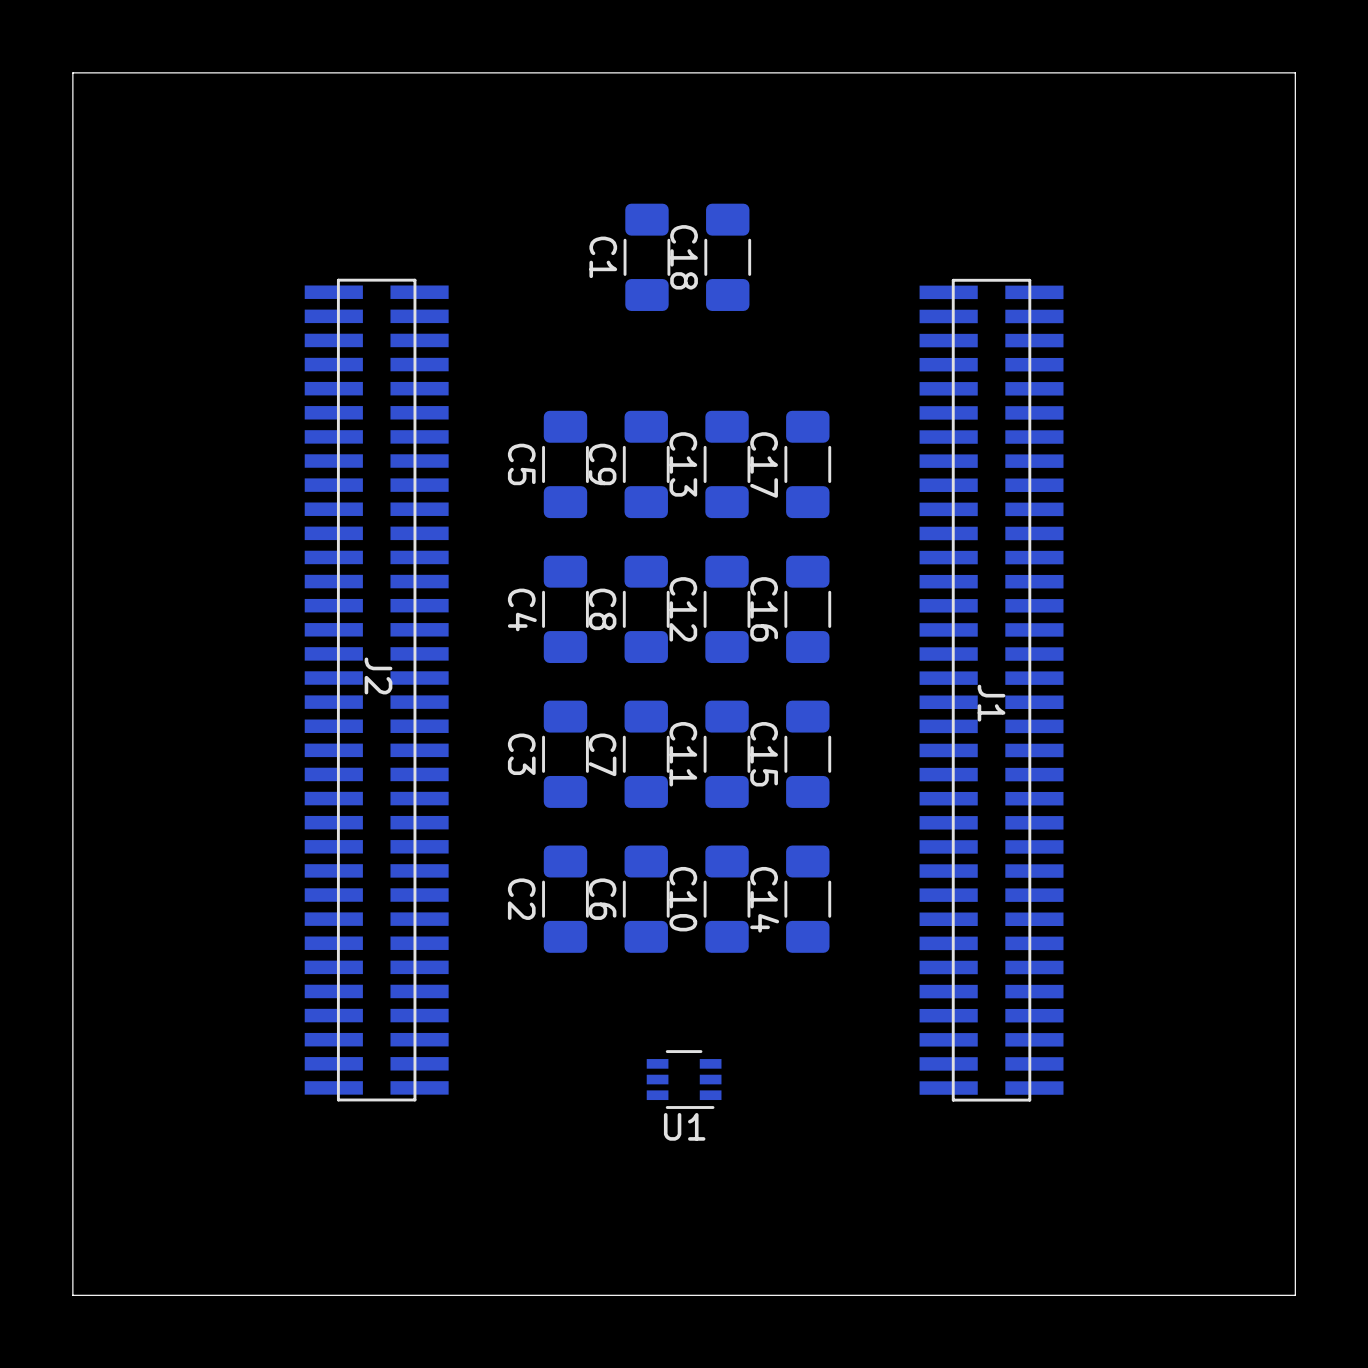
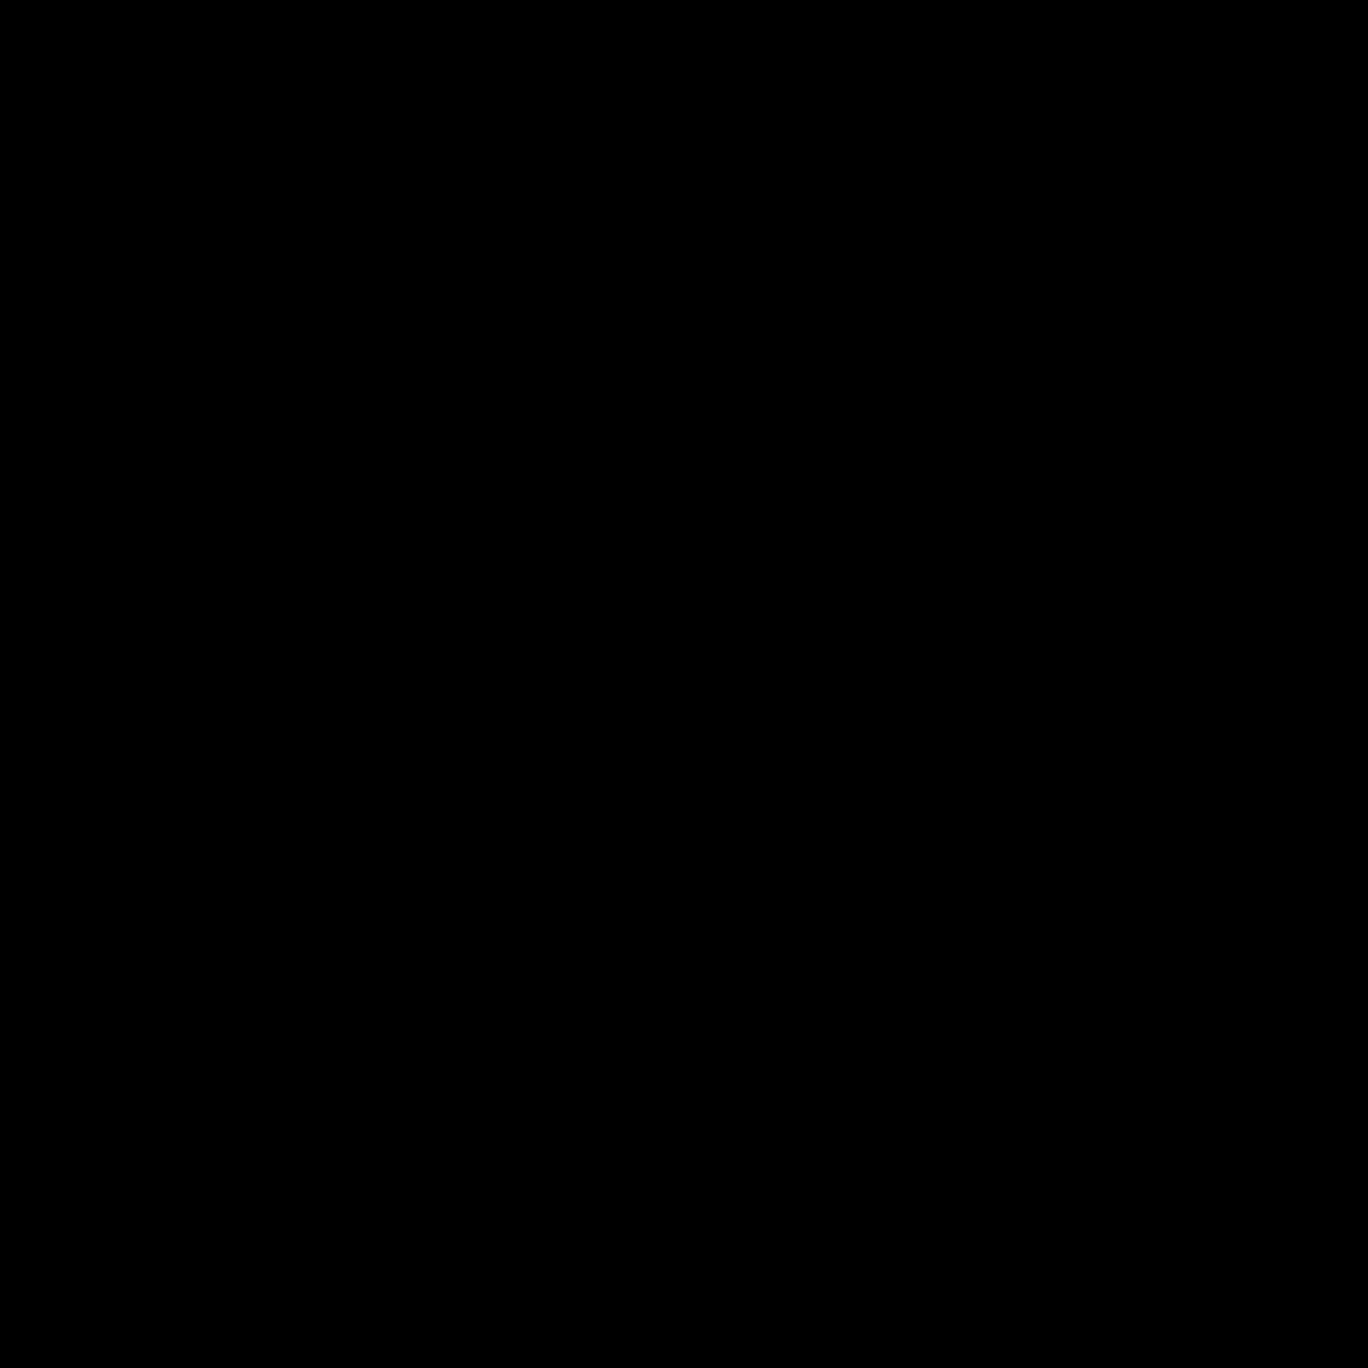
board edge: (1295, 72) (1295, 1295) (72, 1295) (72, 72) (1295, 72) -> none
C1: (646, 257) -> none
C18: (727, 257) -> none
C5: (565, 464) -> none
C9: (646, 464) -> none
C13: (727, 464) -> none
C17: (807, 464) -> none
C4: (565, 609) -> none
C8: (646, 609) -> none
C12: (727, 609) -> none
C16: (807, 609) -> none
J2: (376, 690) -> none
J1: (991, 690) -> none
C3: (565, 754) -> none
C7: (646, 754) -> none
C11: (727, 754) -> none
C15: (807, 754) -> none
C2: (565, 899) -> none
C6: (646, 899) -> none
C10: (727, 899) -> none
C14: (807, 899) -> none
U1: (684, 1079) -> none

